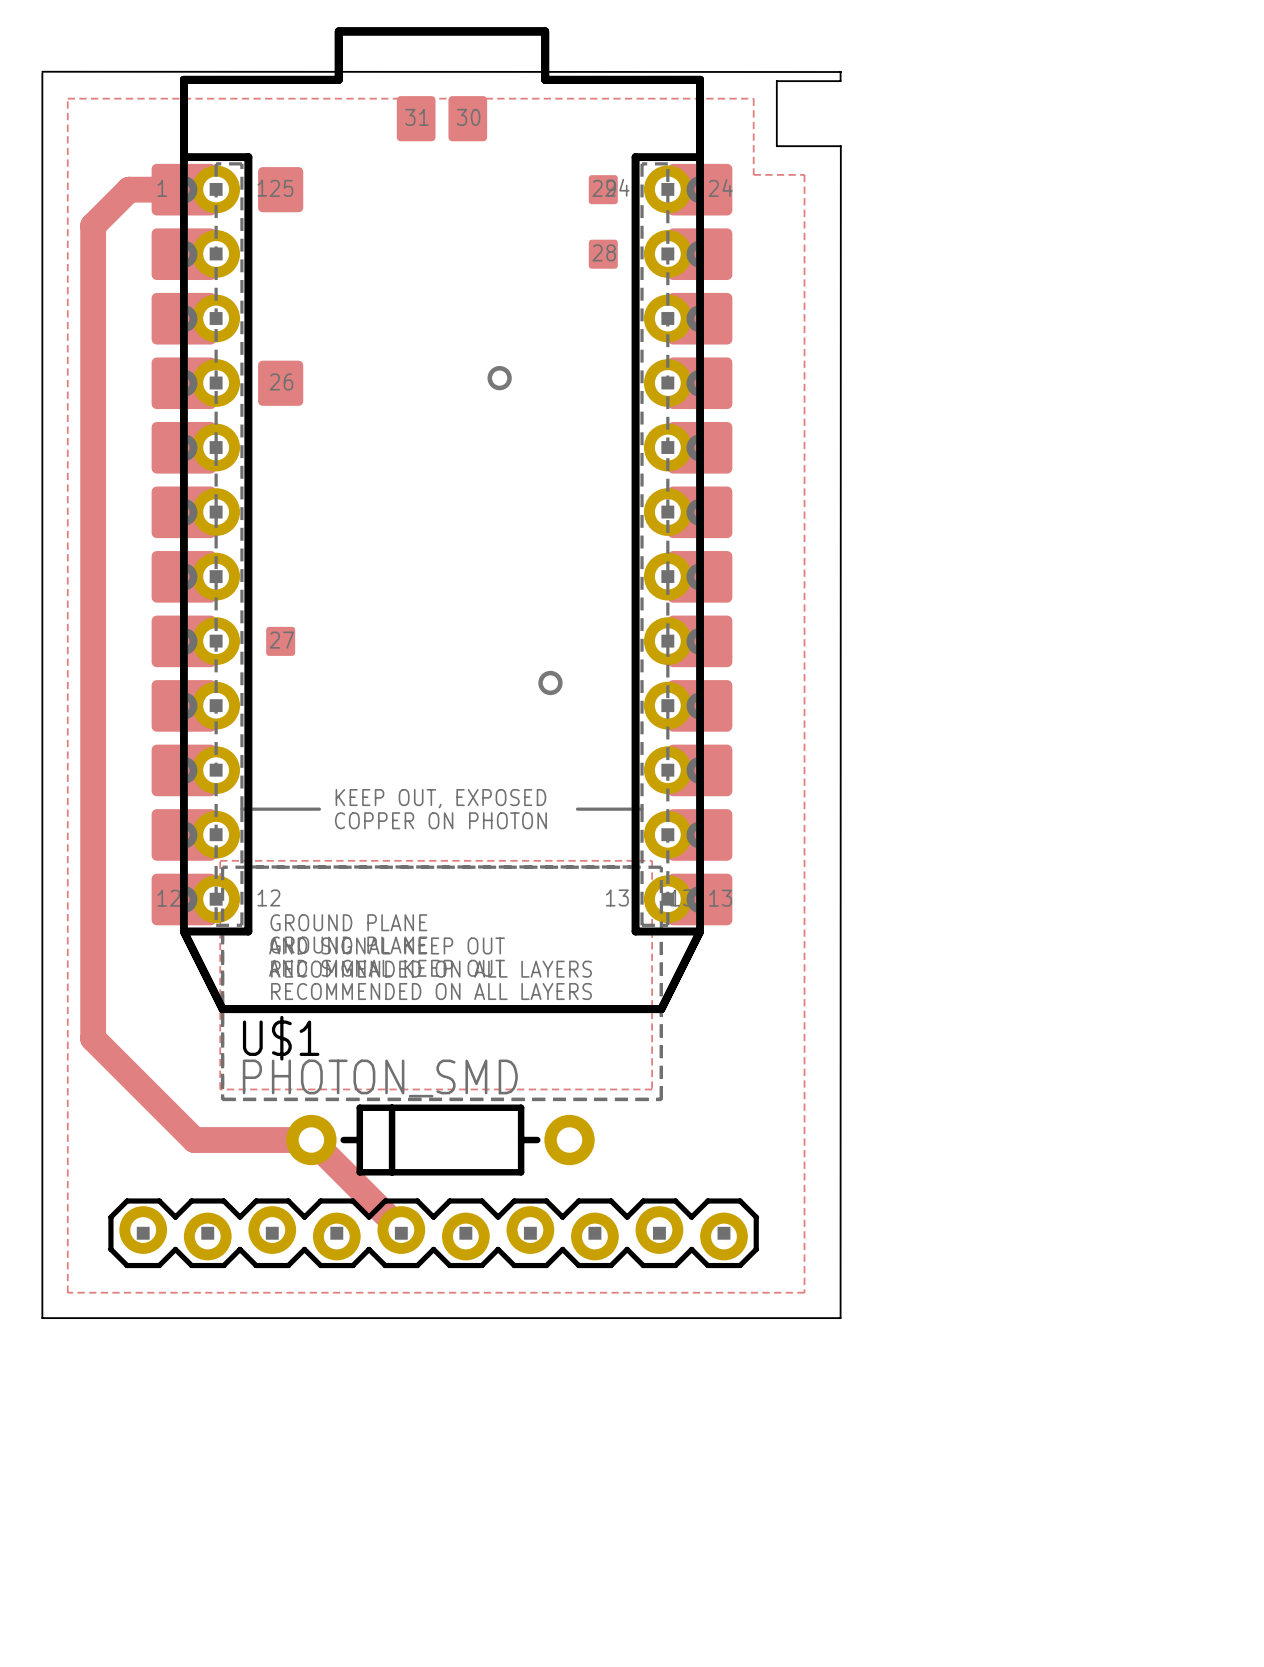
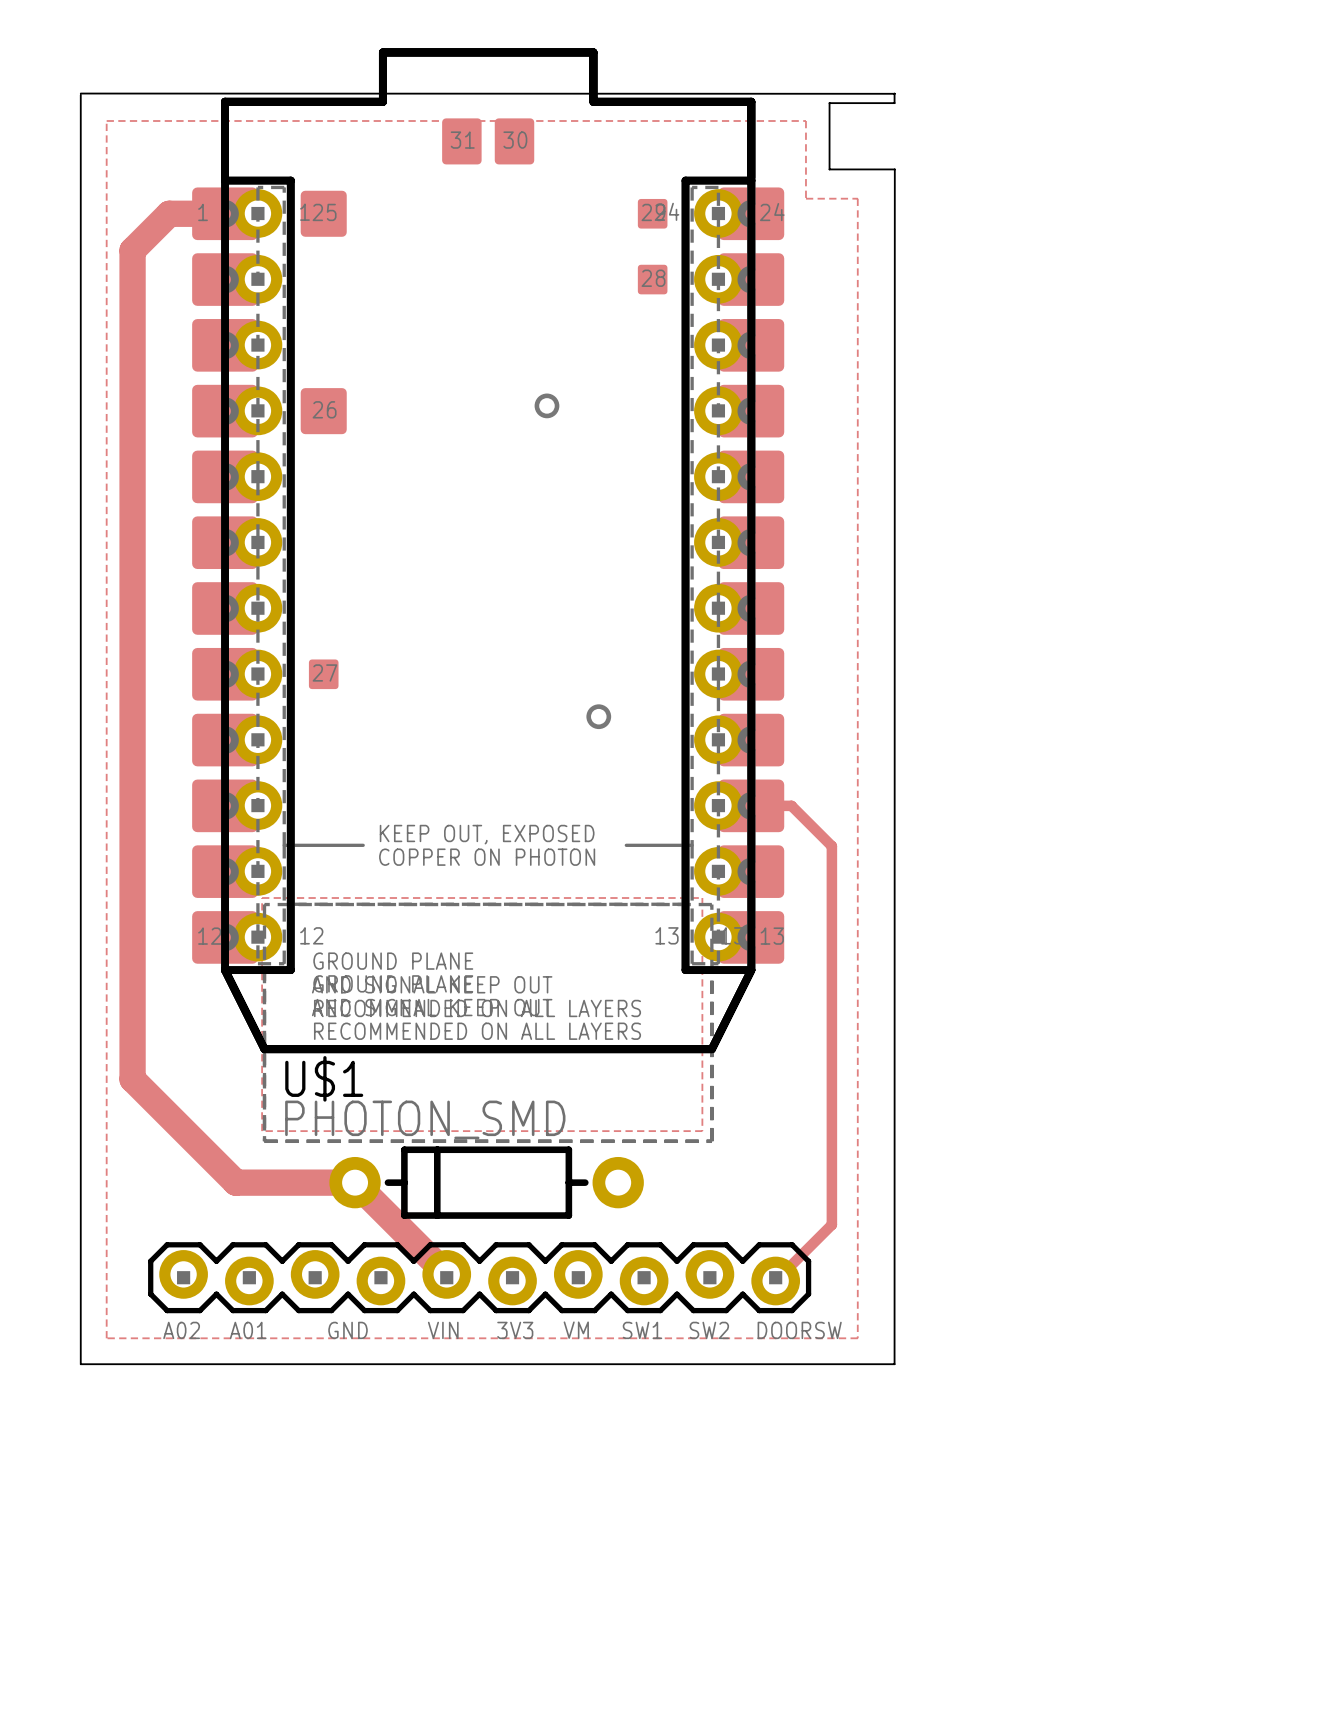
track: none -> (751, 805) (791, 805) (831, 846) (831, 1224) (775, 1280)
text: none -> A02 (181, 1330)
text: none -> A01 (248, 1330)
text: none -> GND (348, 1330)
text: none -> VIN (443, 1330)
text: none -> 3V3 (515, 1330)
text: none -> VM (576, 1330)
text: none -> SW1 (642, 1330)
text: none -> SW2 (709, 1330)
text: none -> DOORSW (799, 1330)

